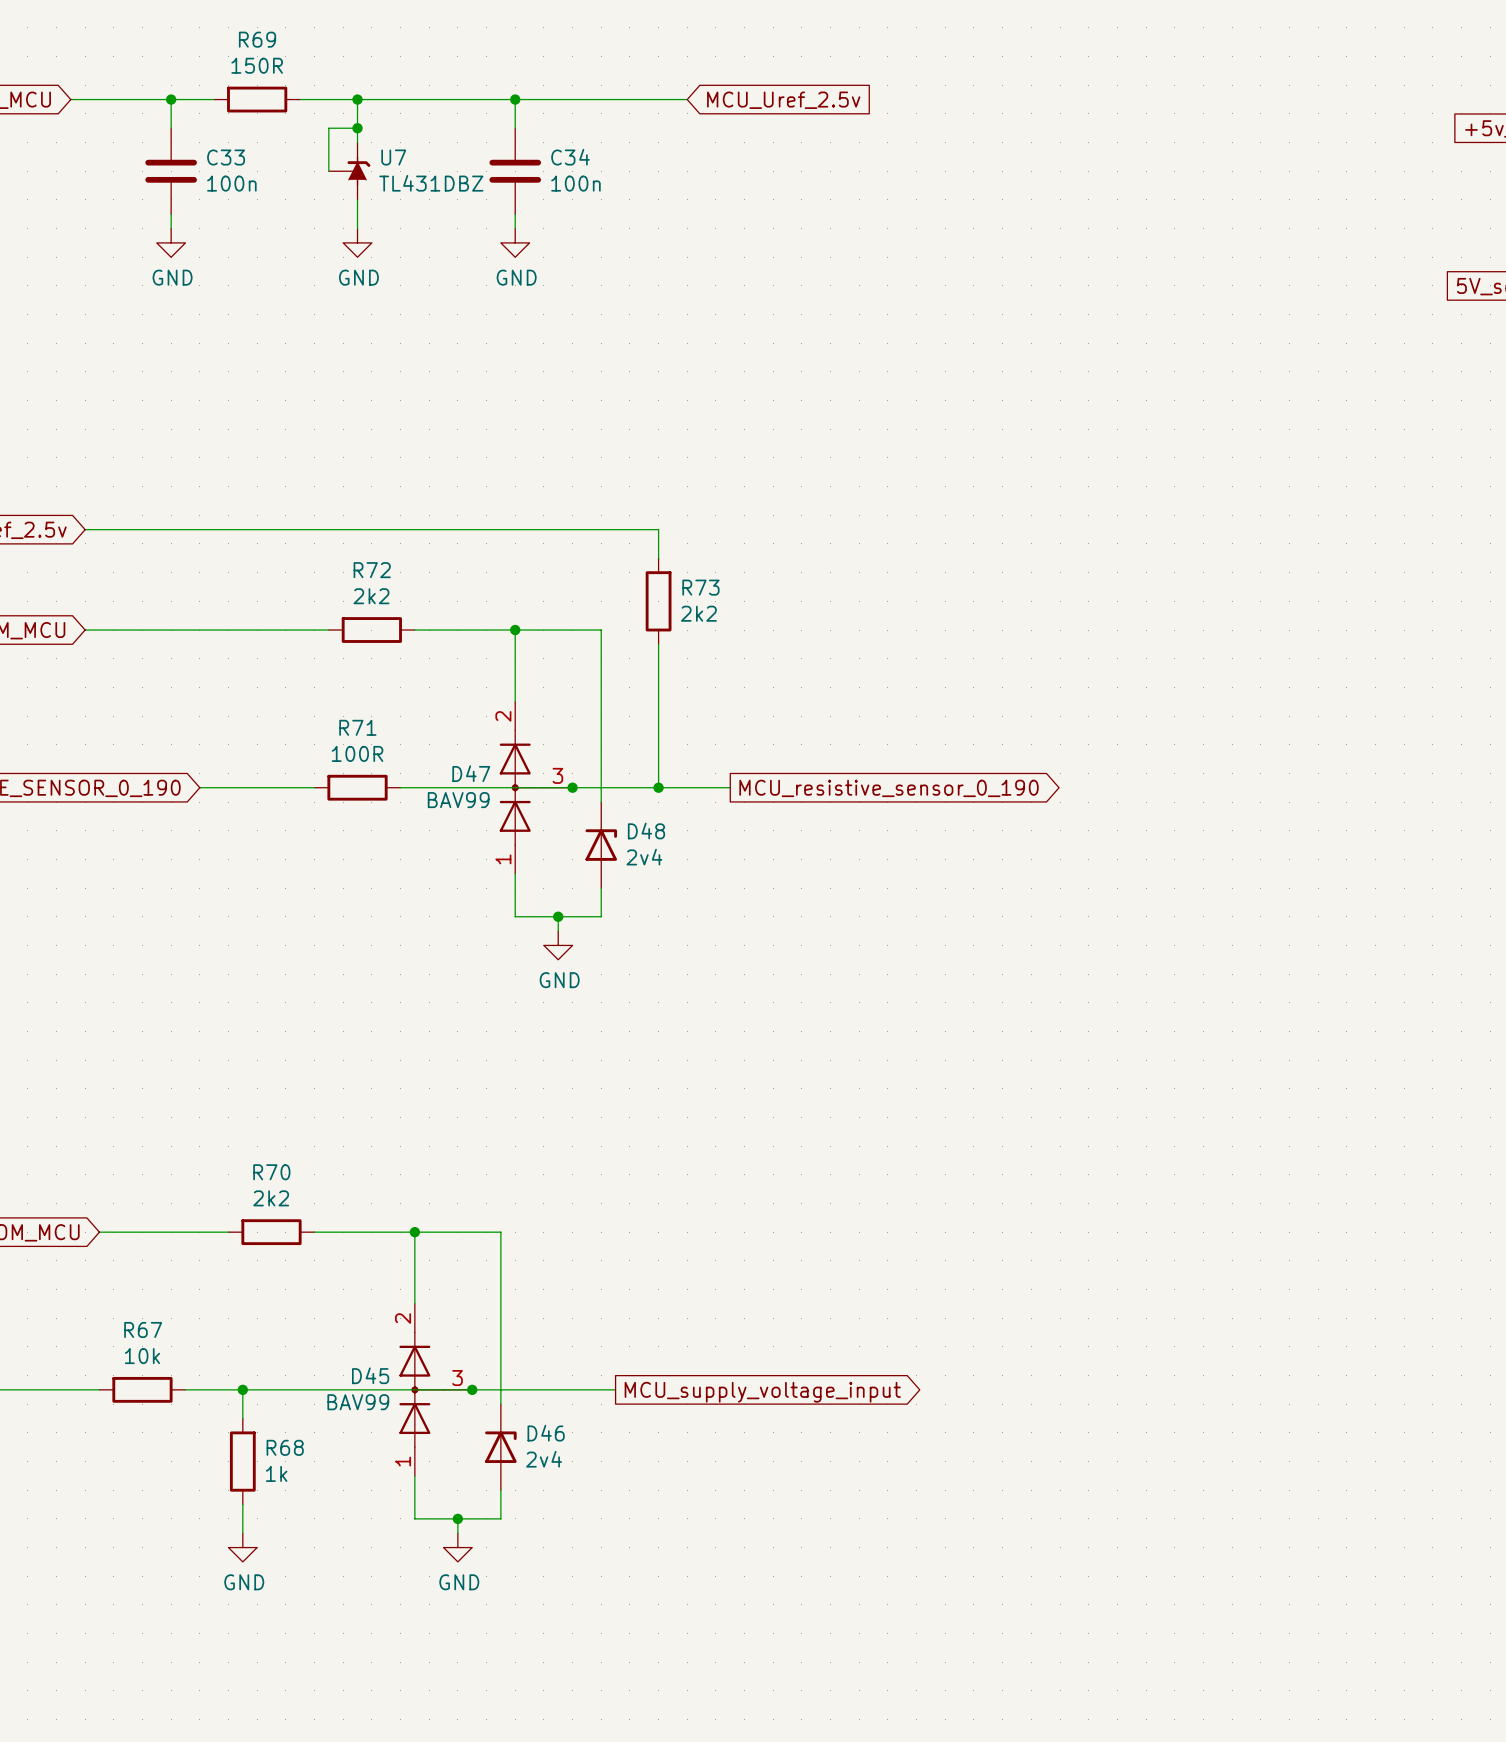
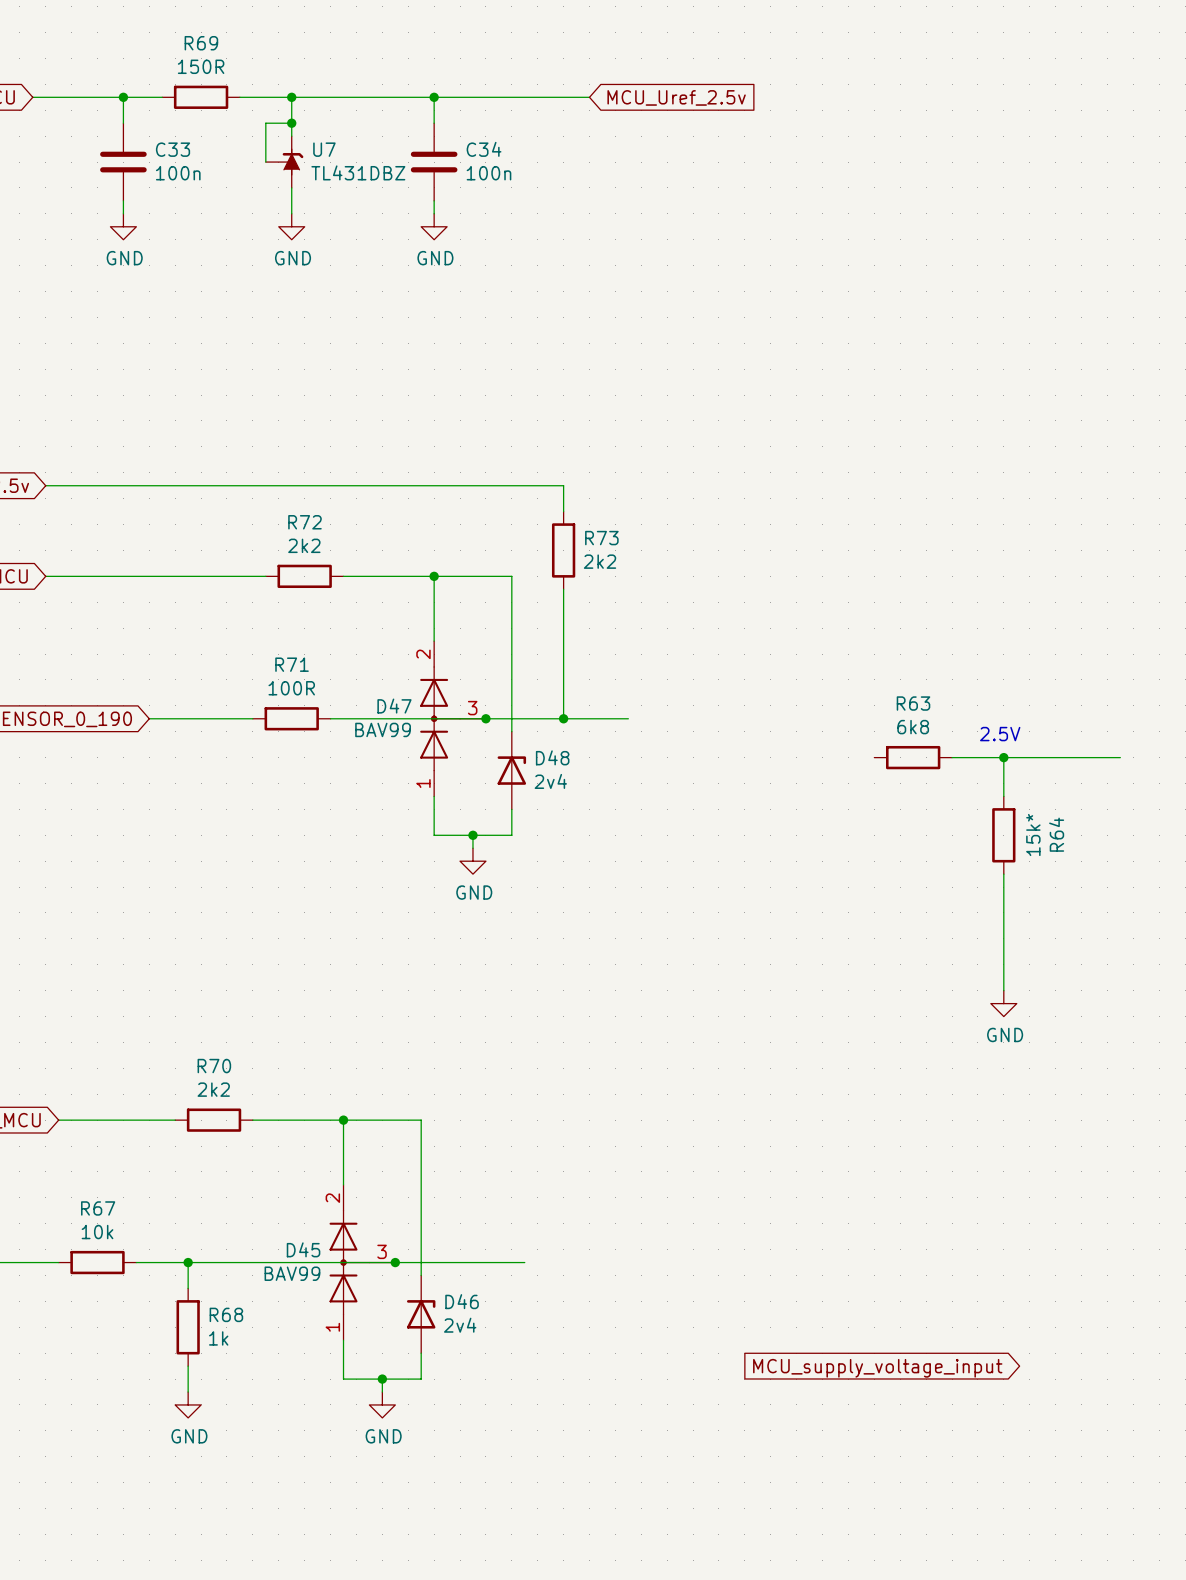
global label: MCU_resistive_sensor_0_190 (889, 788) -> none
text: none -> 2.5V (1000, 734)
R63: none -> 6k8 (913, 757)
wire: none -> (952, 757) (1120, 757)
wire: none -> (1003, 757) (1003, 796)
junction: none -> (1003, 757)
R64: none -> 15k* (1003, 835)
wire: none -> (1003, 874) (1003, 990)
power symbol: none -> GND (1003, 1003)
global label position: MCU_supply_voltage_input (762, 1392) -> MCU_supply_voltage_input (877, 1368)

